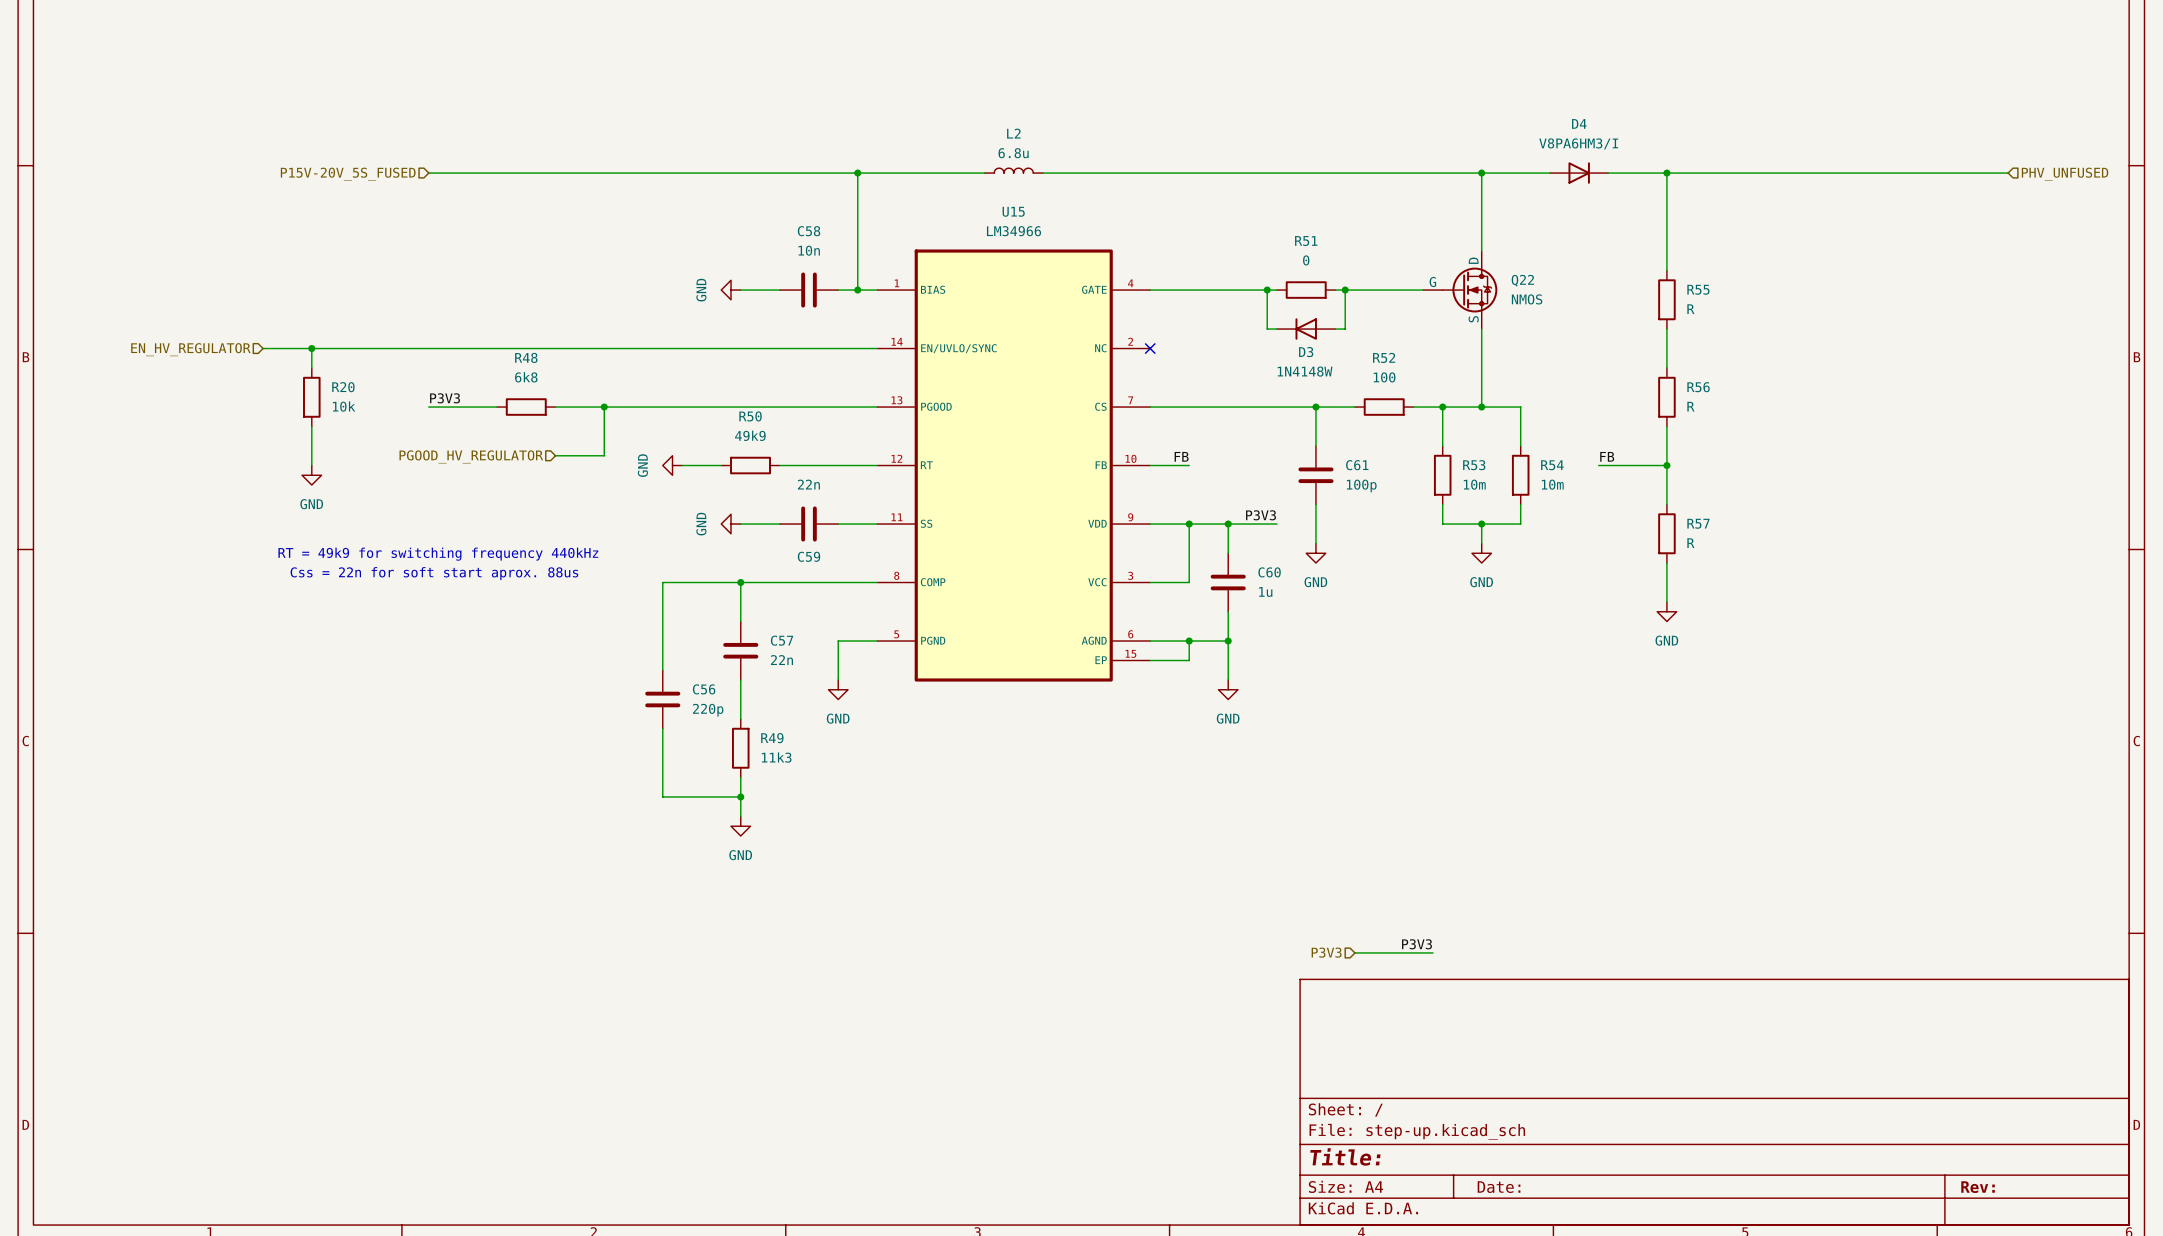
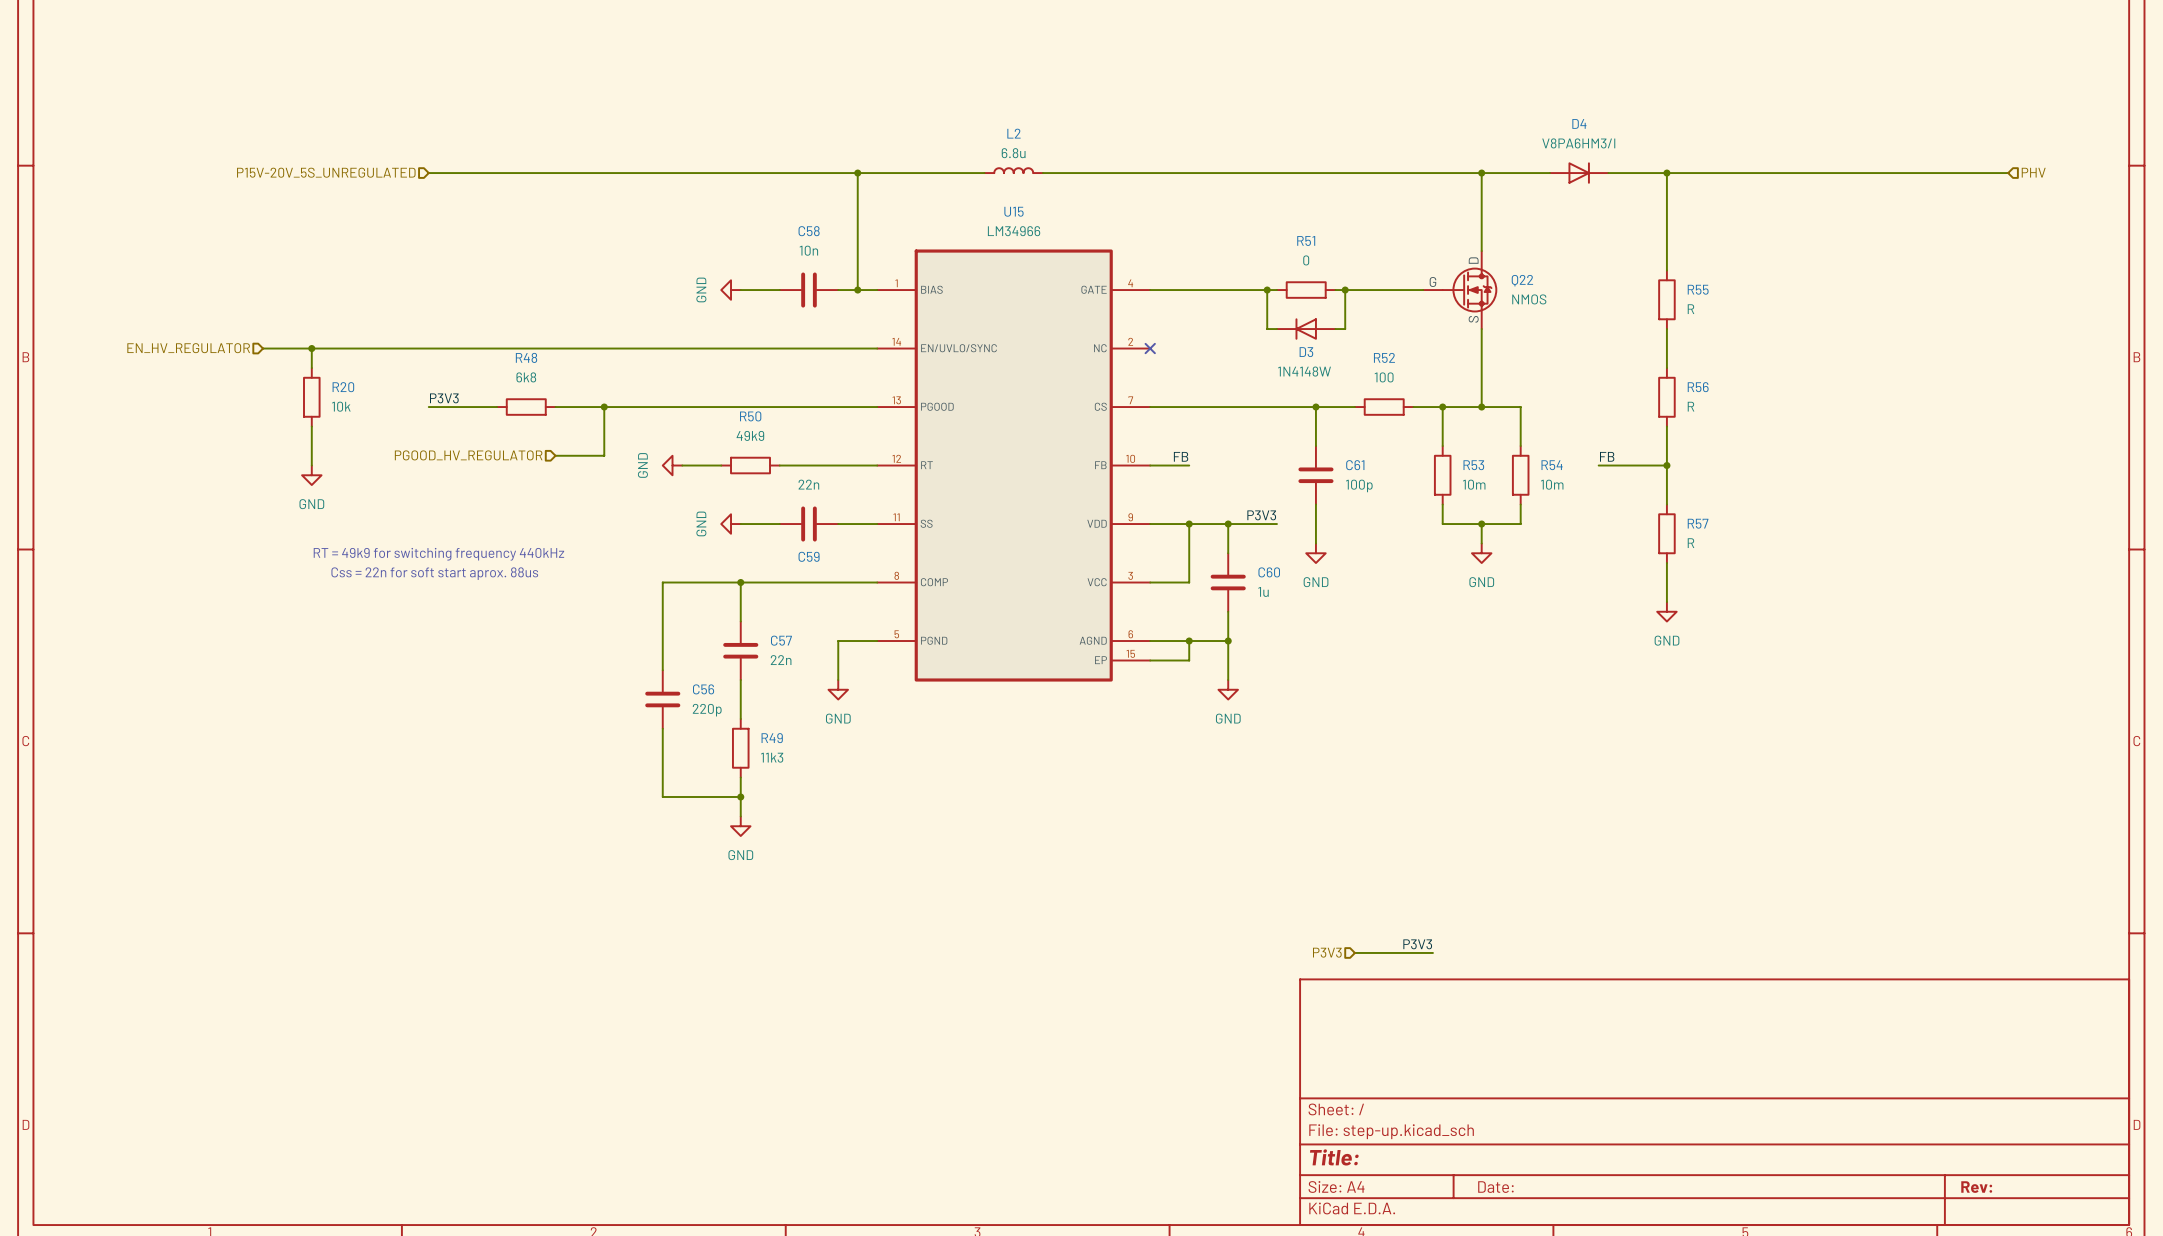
hierarchical label: P15V-20V_5S_FUSED (348, 174) -> P15V-20V_5S_UNREGULATED (326, 172)
hierarchical label: PHV_UNFUSED (2065, 174) -> PHV (2033, 172)

